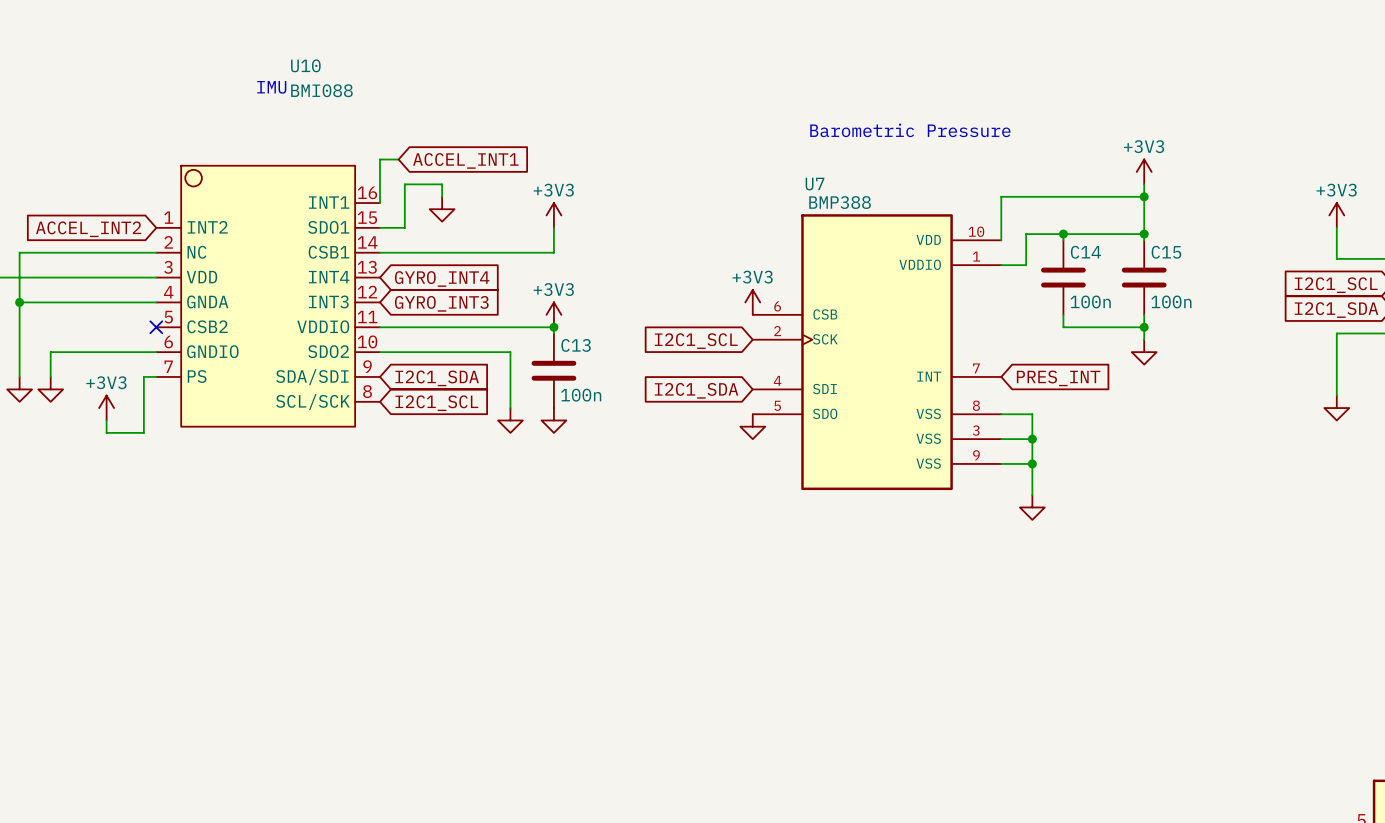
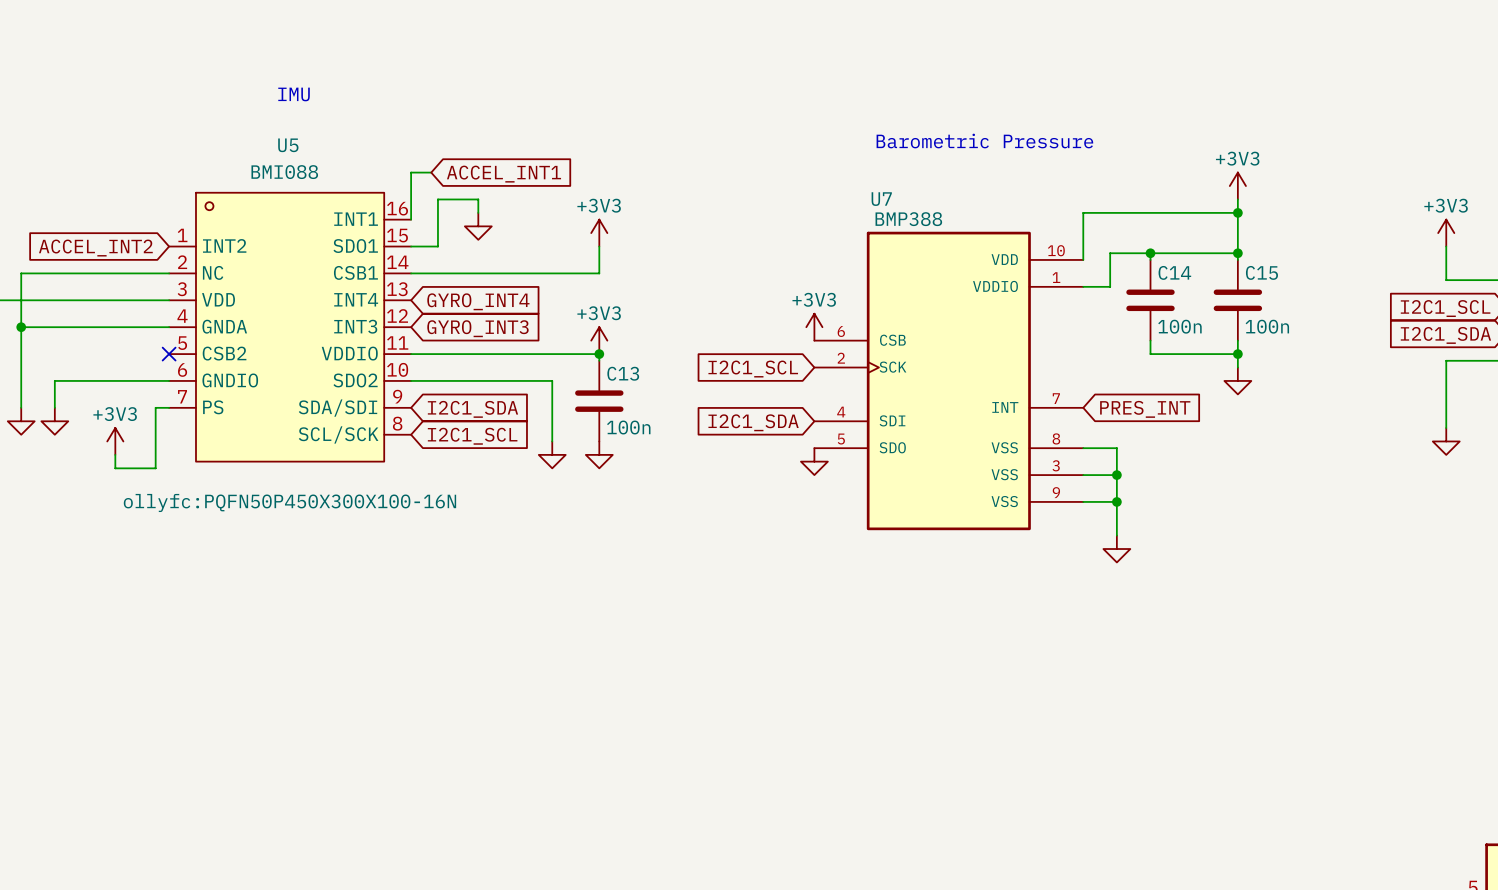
U10: BMI088 (268, 296) -> none
U5: none -> BMI088 (290, 327)

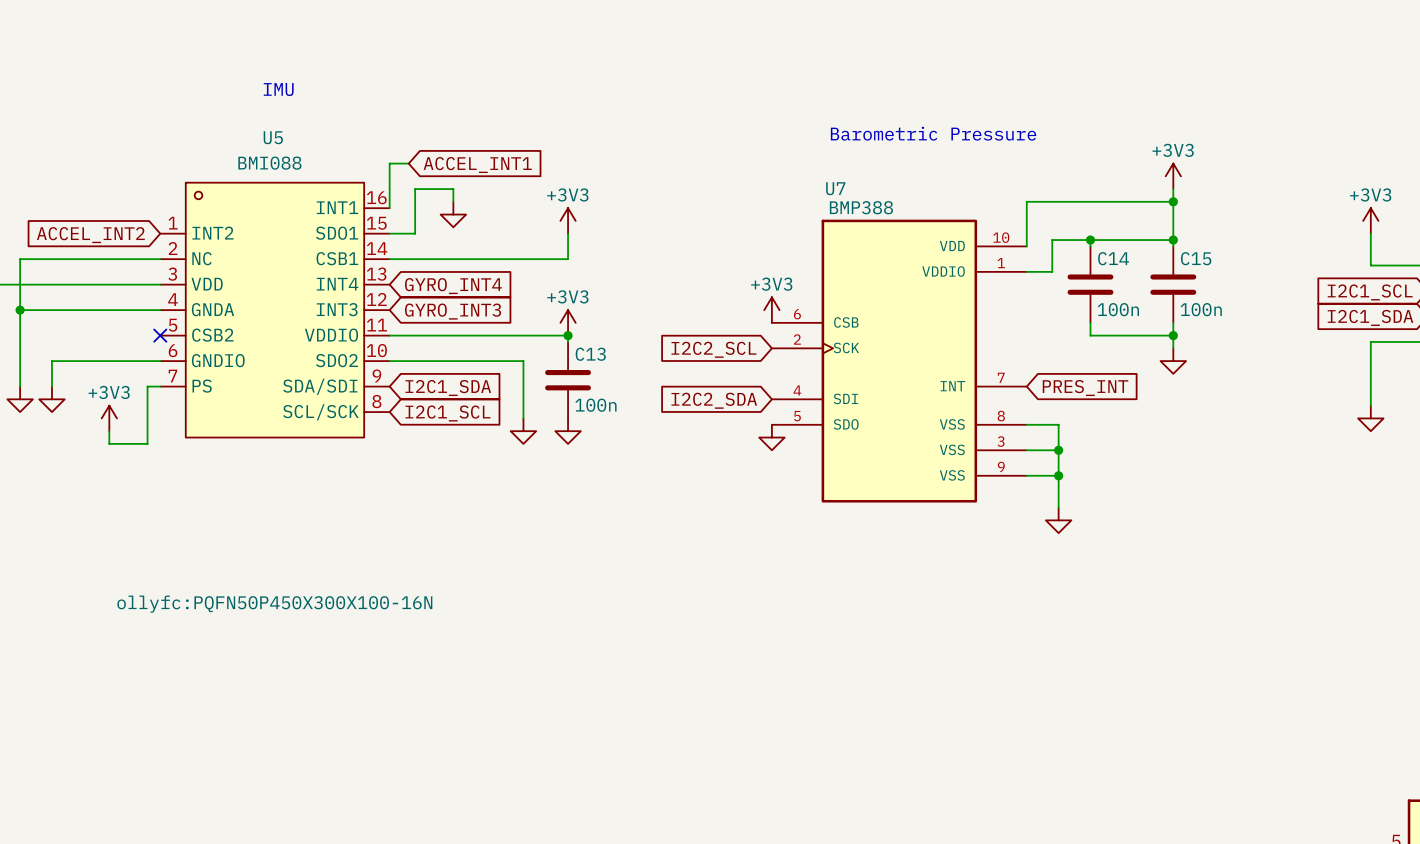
global label: I2C1_SCL (753, 369) -> I2C2_SCL (713, 349)
global label: I2C1_SDA (753, 422) -> I2C2_SDA (714, 400)
U5 text position: ollyfc:PQFN50P450X300X100-16N (289, 502) -> ollyfc:PQFN50P450X300X100-16N (274, 604)

